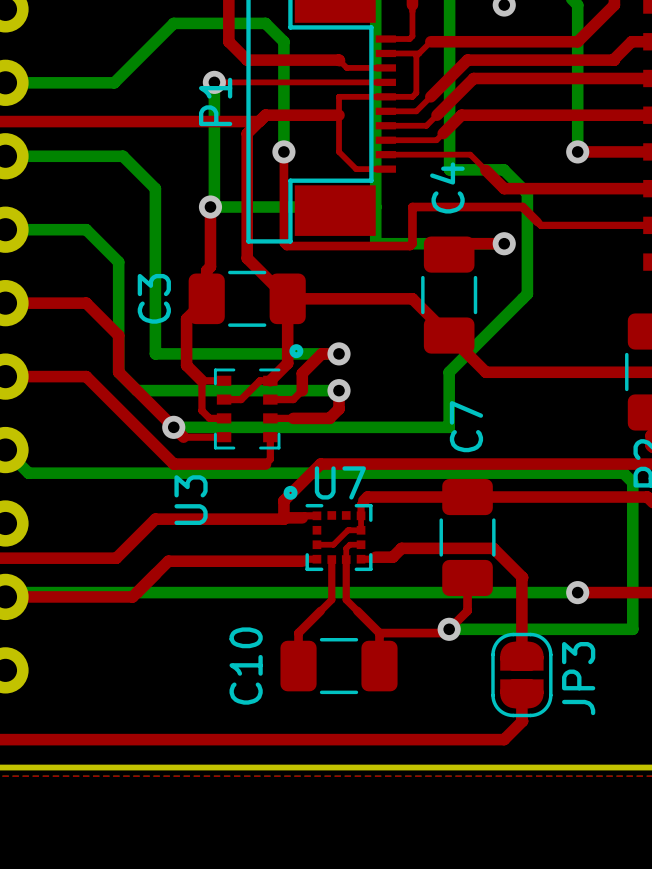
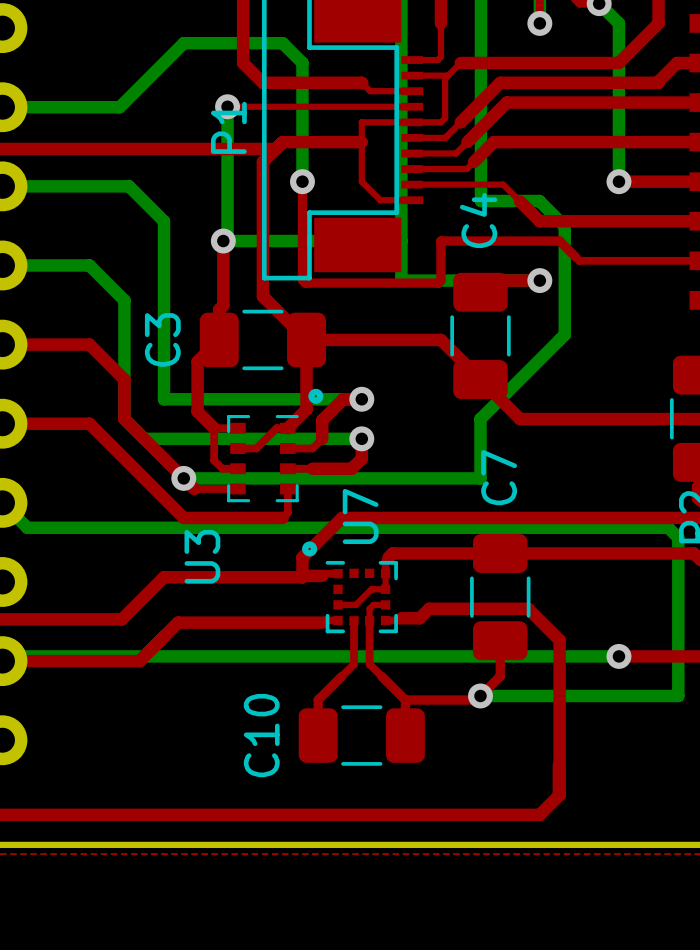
U7 name rotation: 0° (340, 482) -> 90° counterclockwise (360, 516)
top track: (522, 577) (521, 656) -> (559, 640) (559, 794)
JP3: (521, 675) -> none

